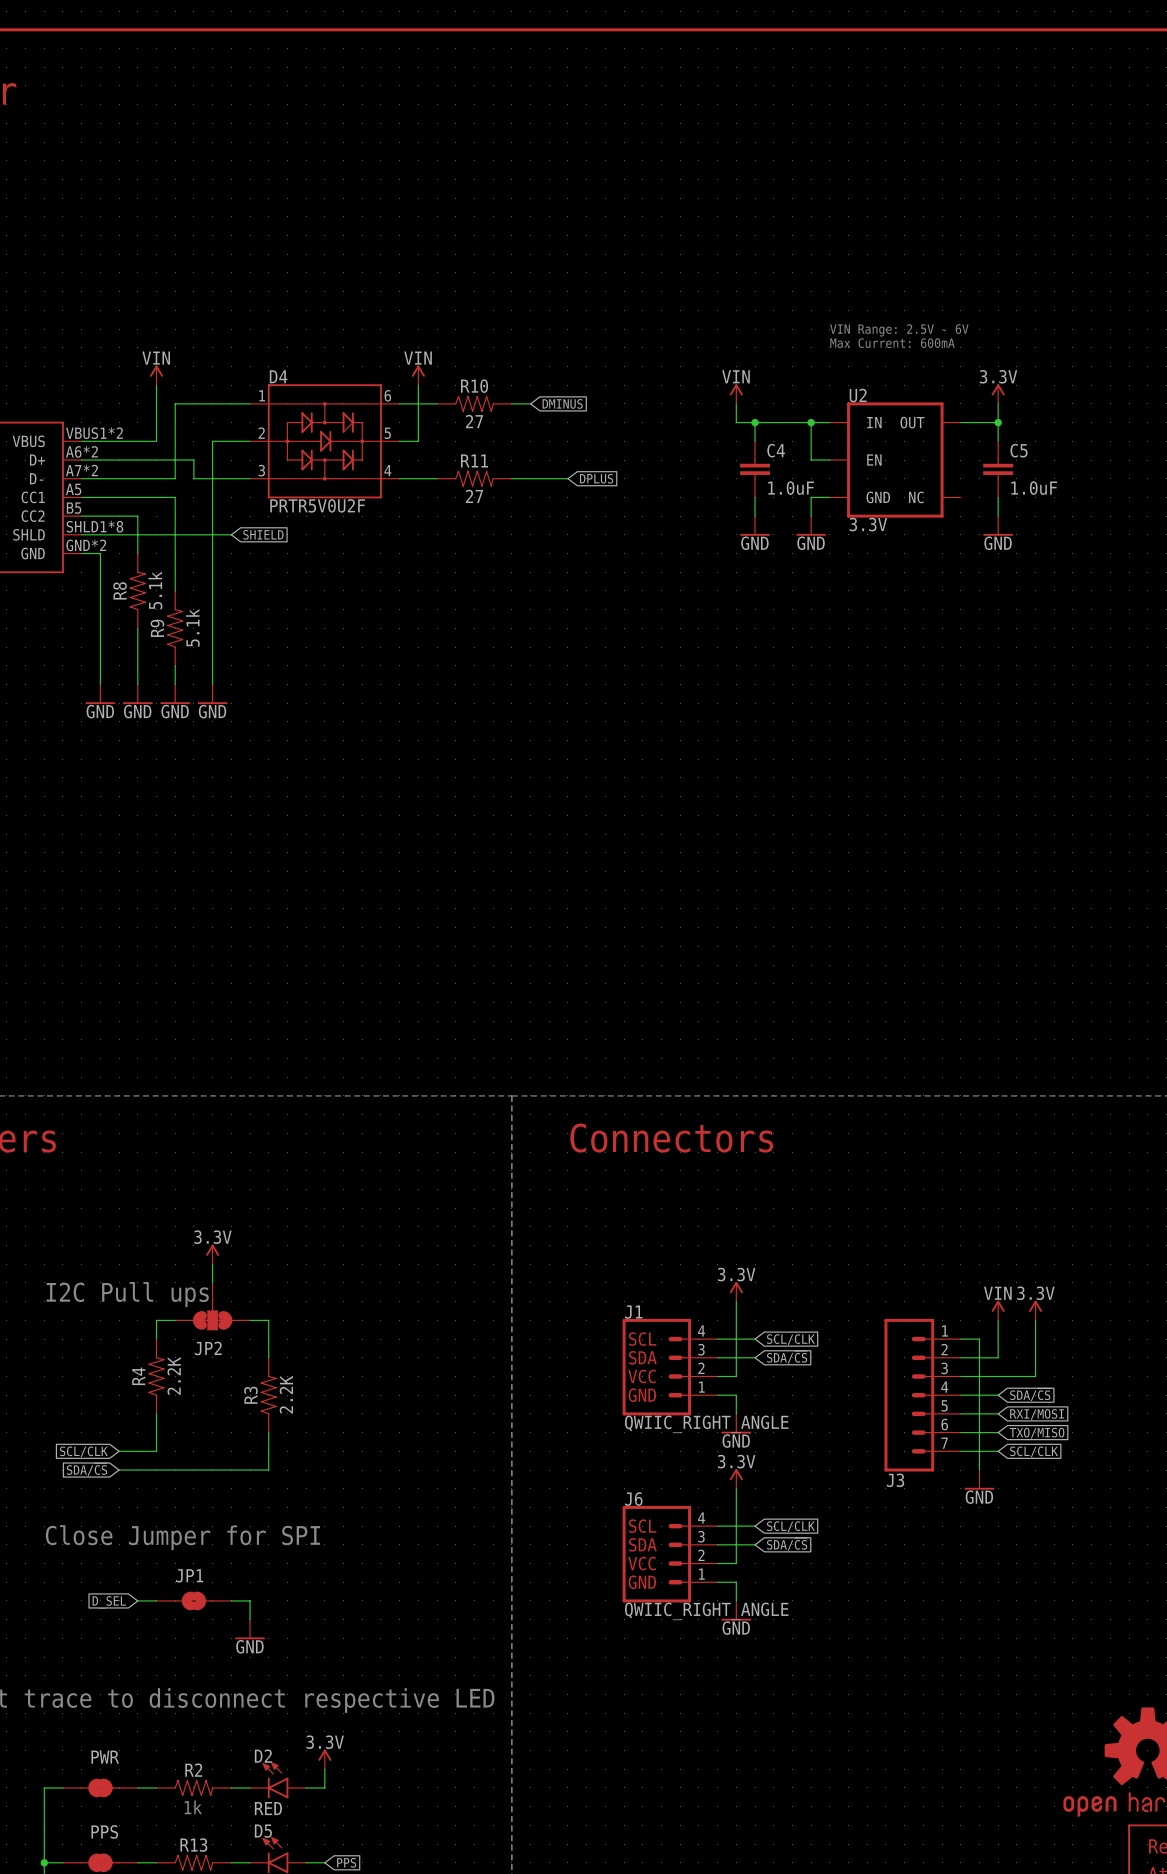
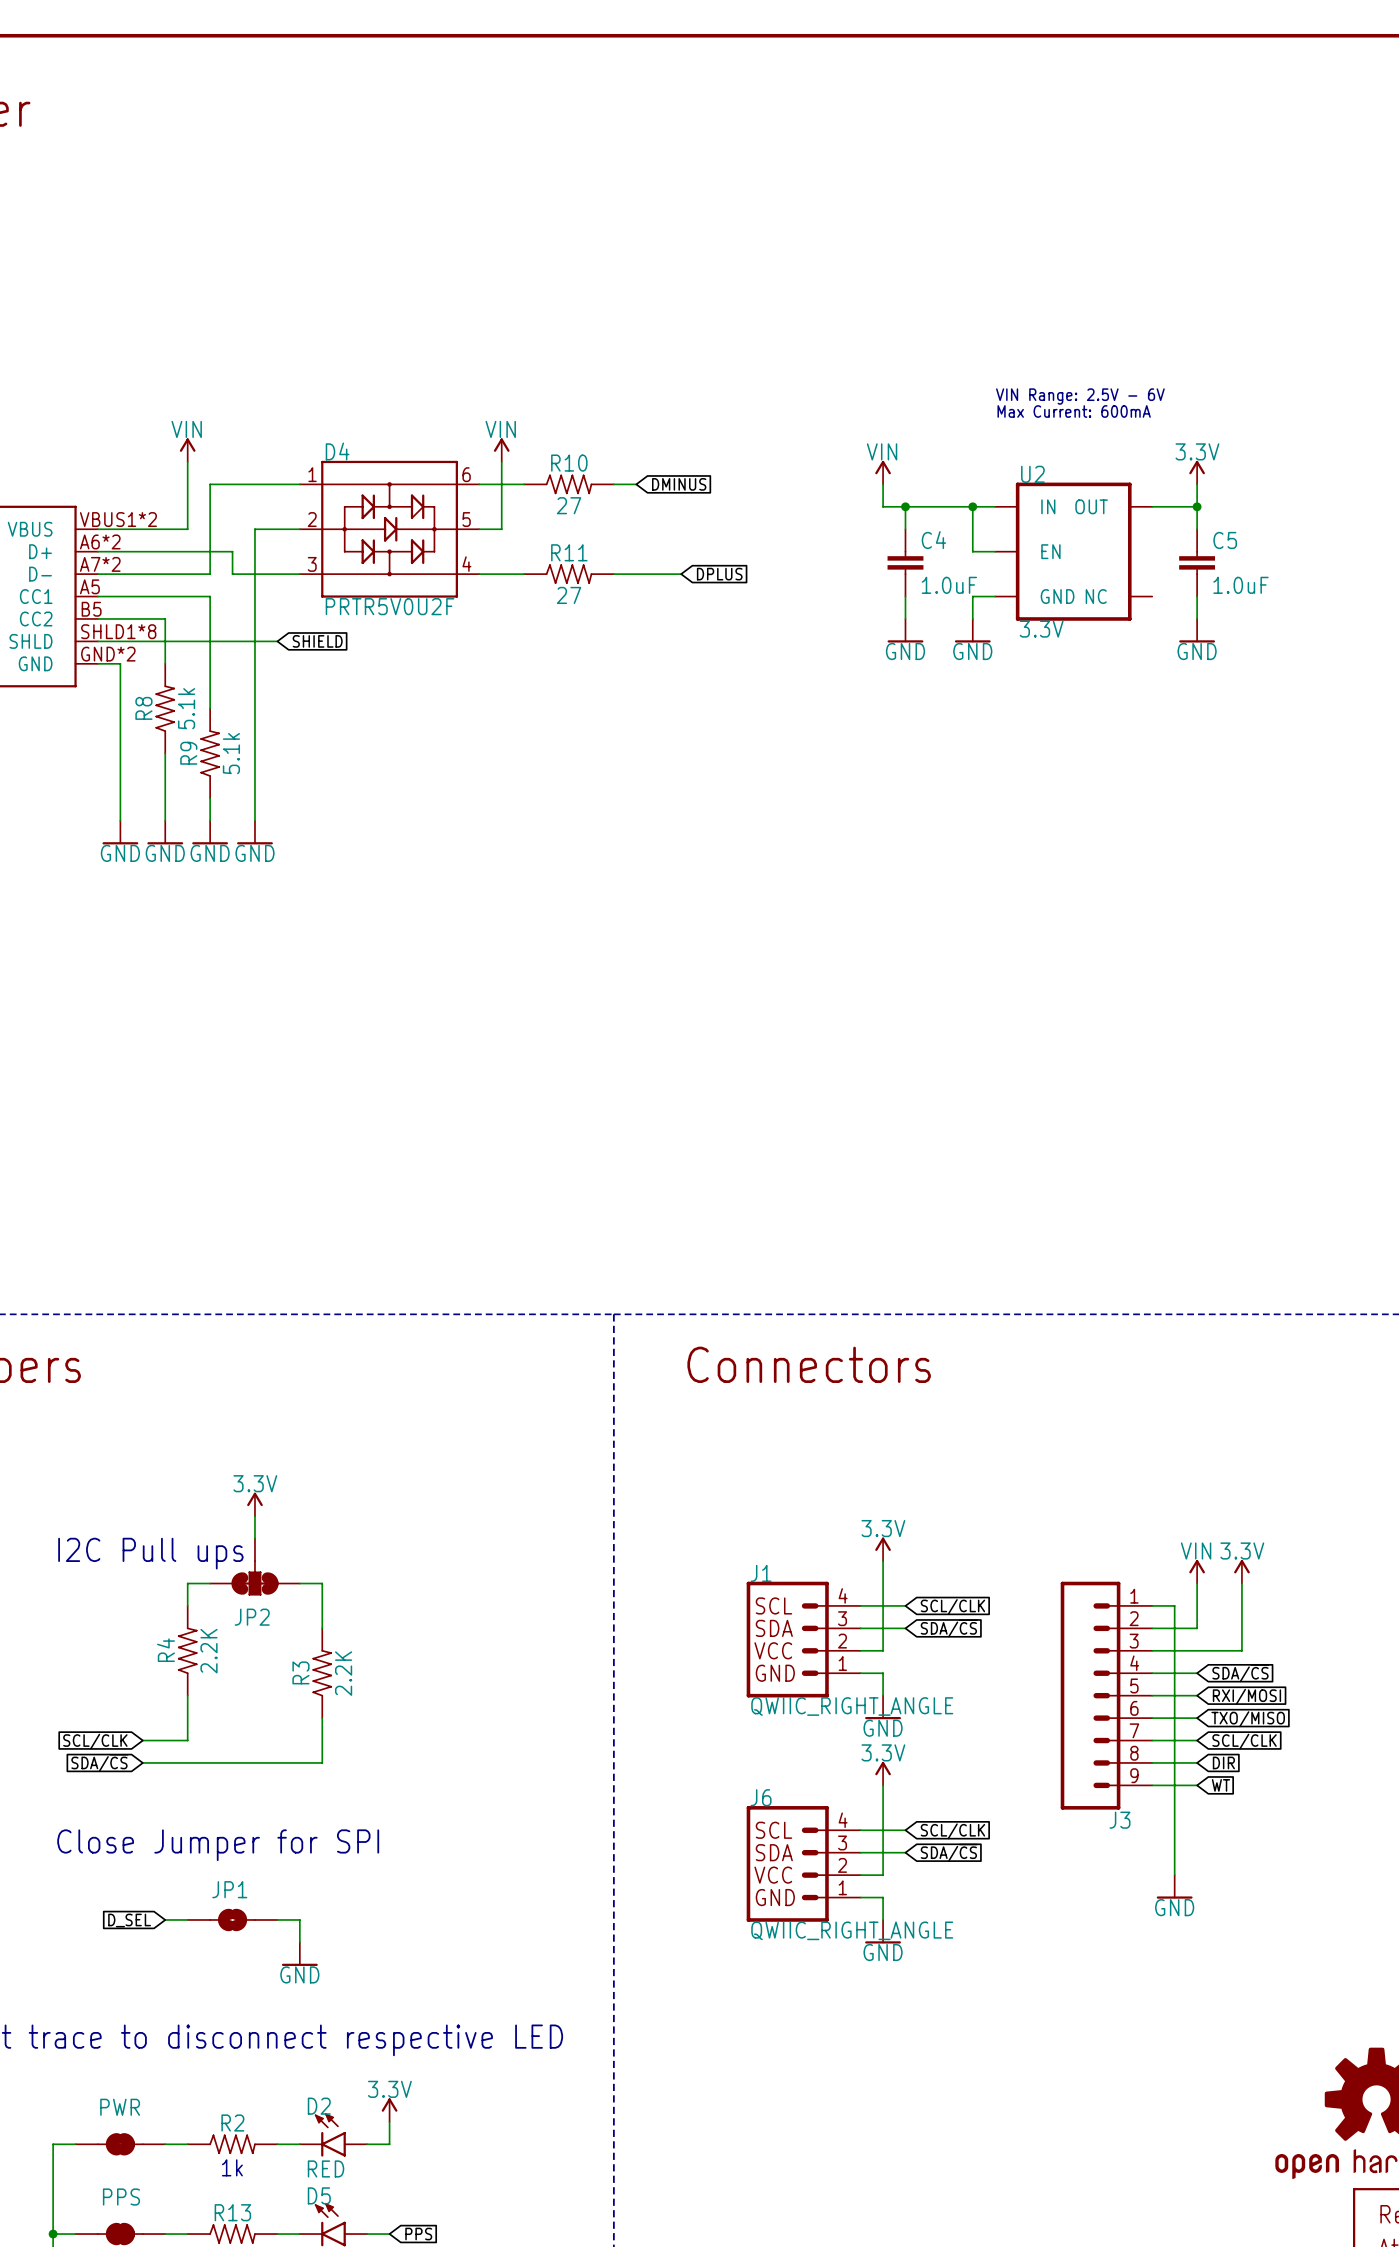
J3 symbol: [884, 1318, 961, 1472] -> [1060, 1581, 1153, 1810]
wire: none -> (1152, 1762) (1197, 1762)
wire: none -> (1174, 1762) (1174, 1875)
global label: none -> DIR (1223, 1762)
power symbol position: GND (979, 1479) -> GND (1174, 1886)
J3 name position: J3 (895, 1480) -> J3 (1119, 1820)
global label: none -> WT (1220, 1785)

